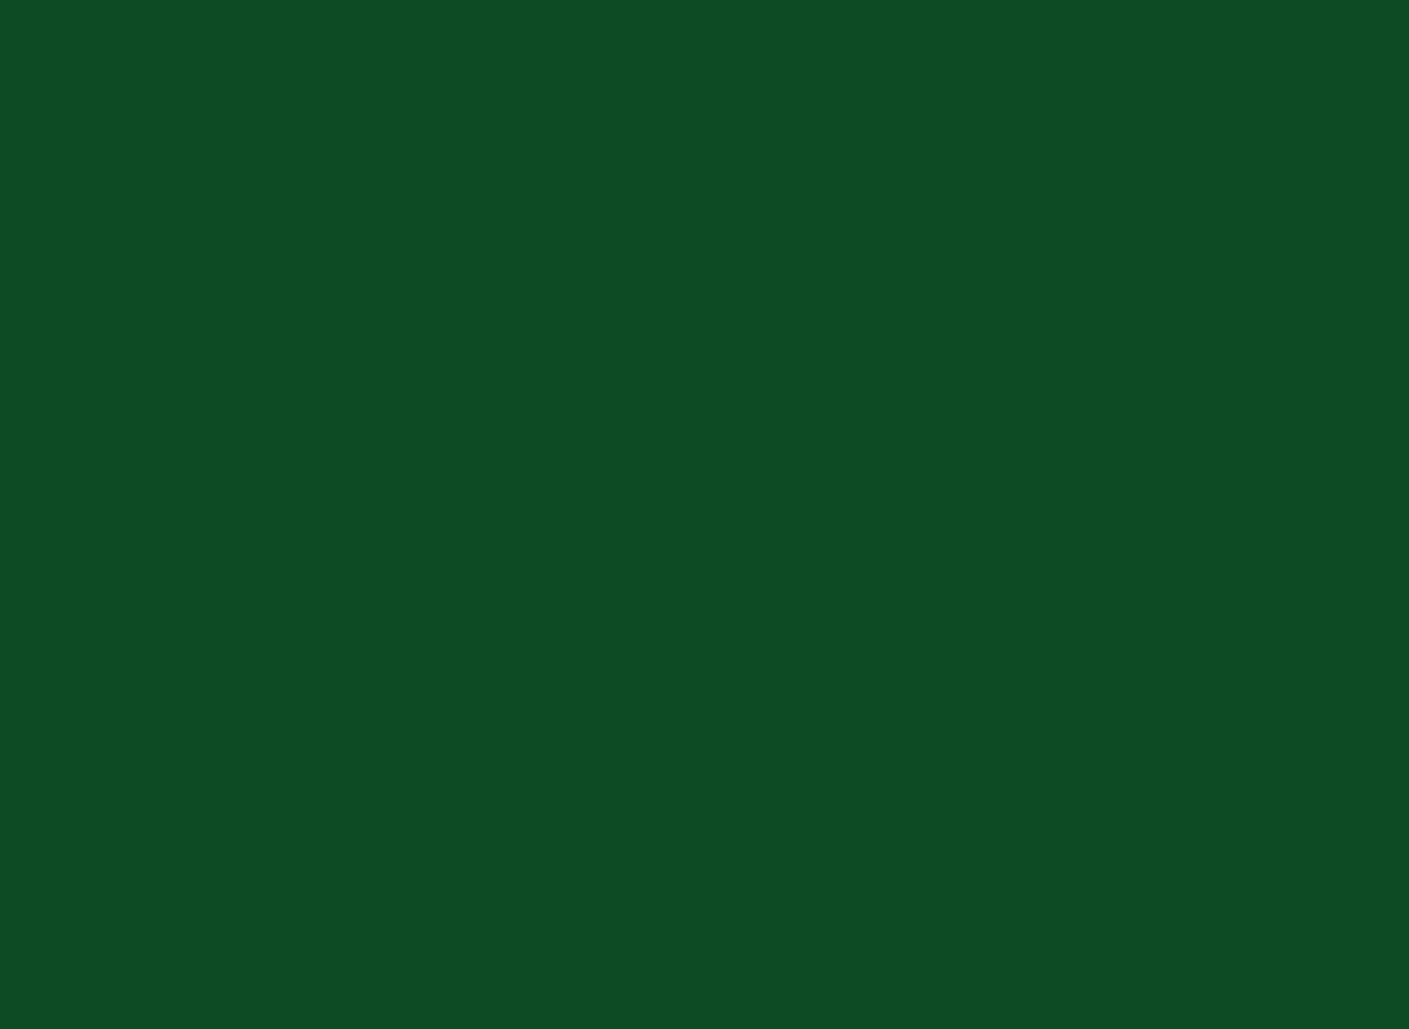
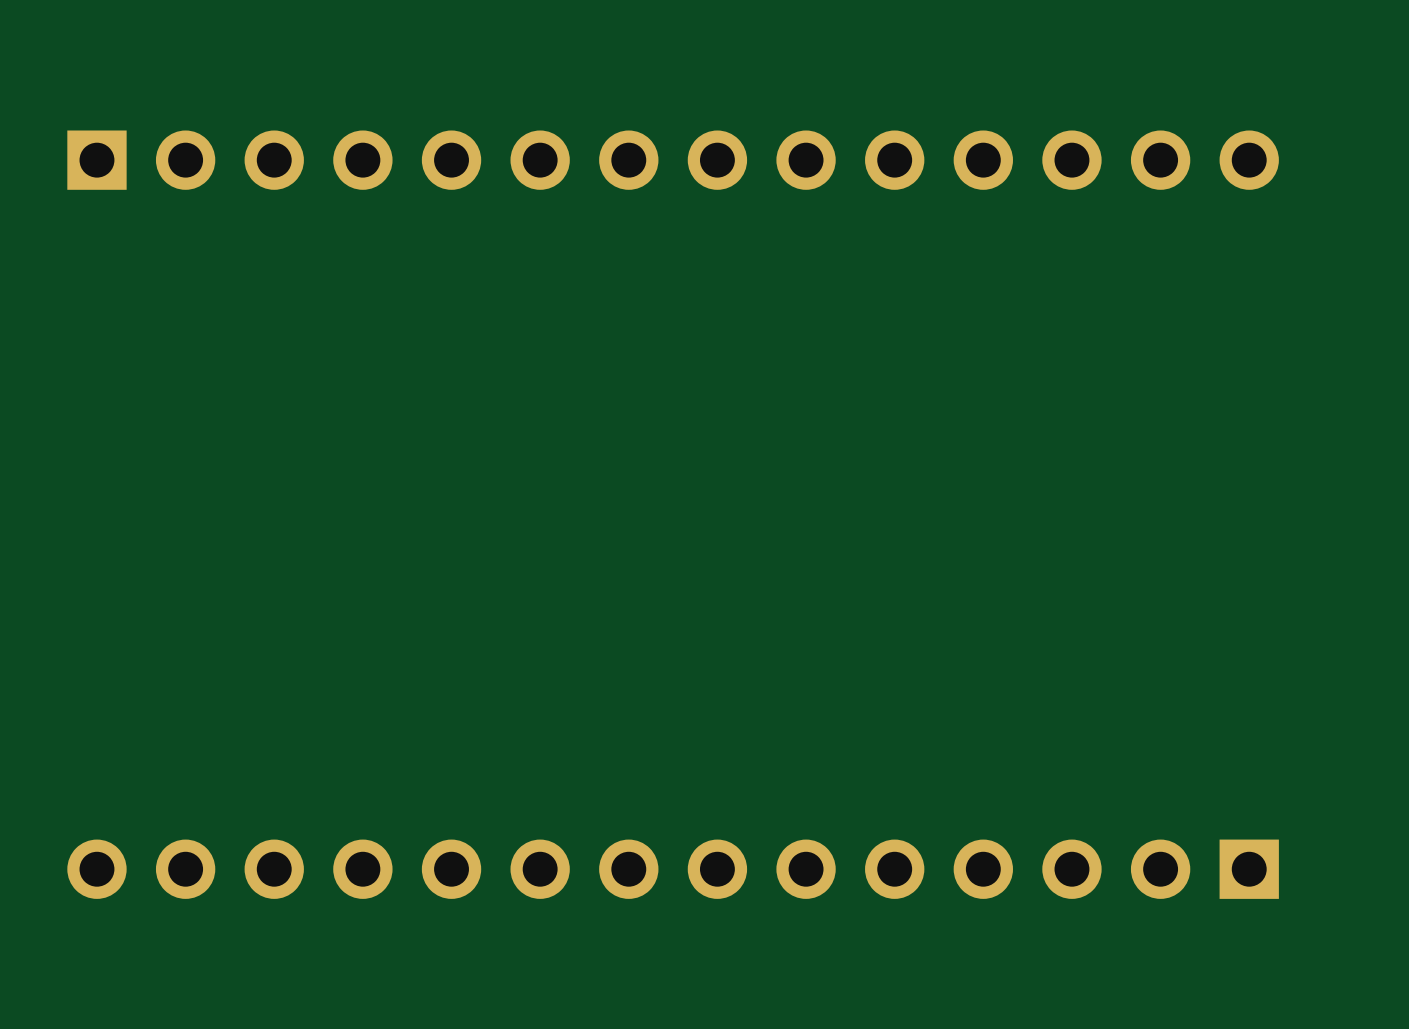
part: none -> (673, 160)
part: none -> (673, 869)

